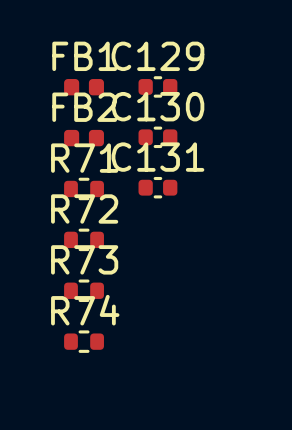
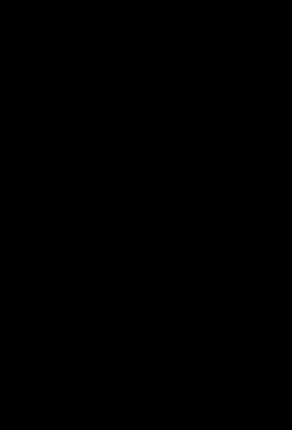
C129: (157, 86) -> none
FB1: (84, 87) -> none
C130: (157, 137) -> none
FB2: (84, 138) -> none
C131: (157, 187) -> none
R71: (84, 188) -> none
R72: (84, 239) -> none
R73: (84, 290) -> none
R74: (84, 341) -> none

